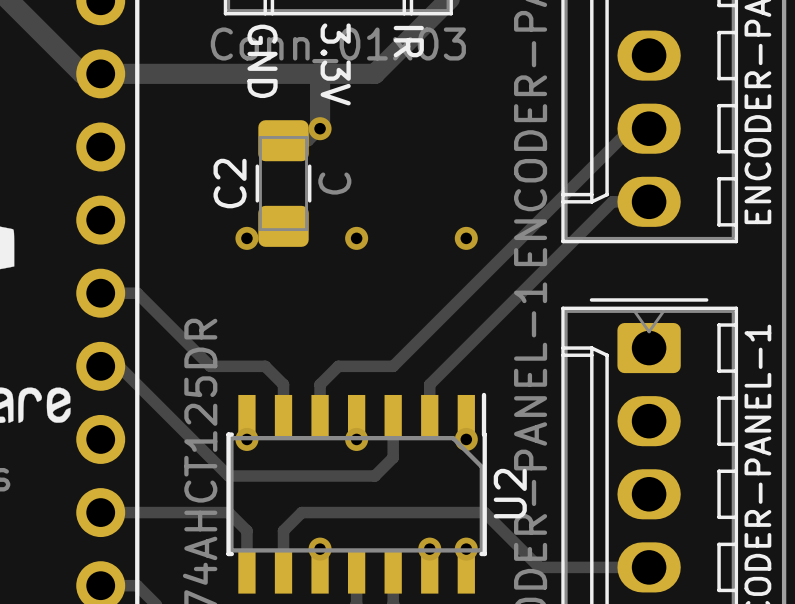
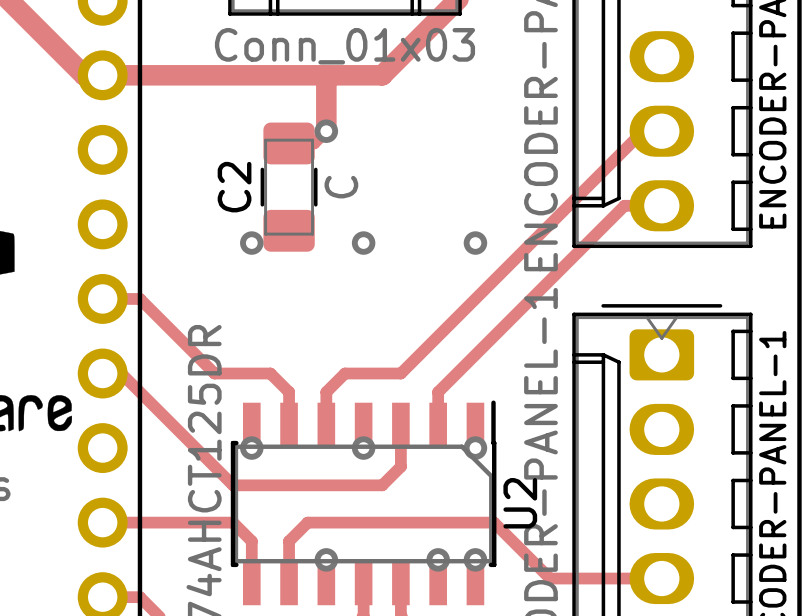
text: IR (408, 41) -> none
text: GND (262, 61) -> none
text: 3.3V (335, 64) -> none

